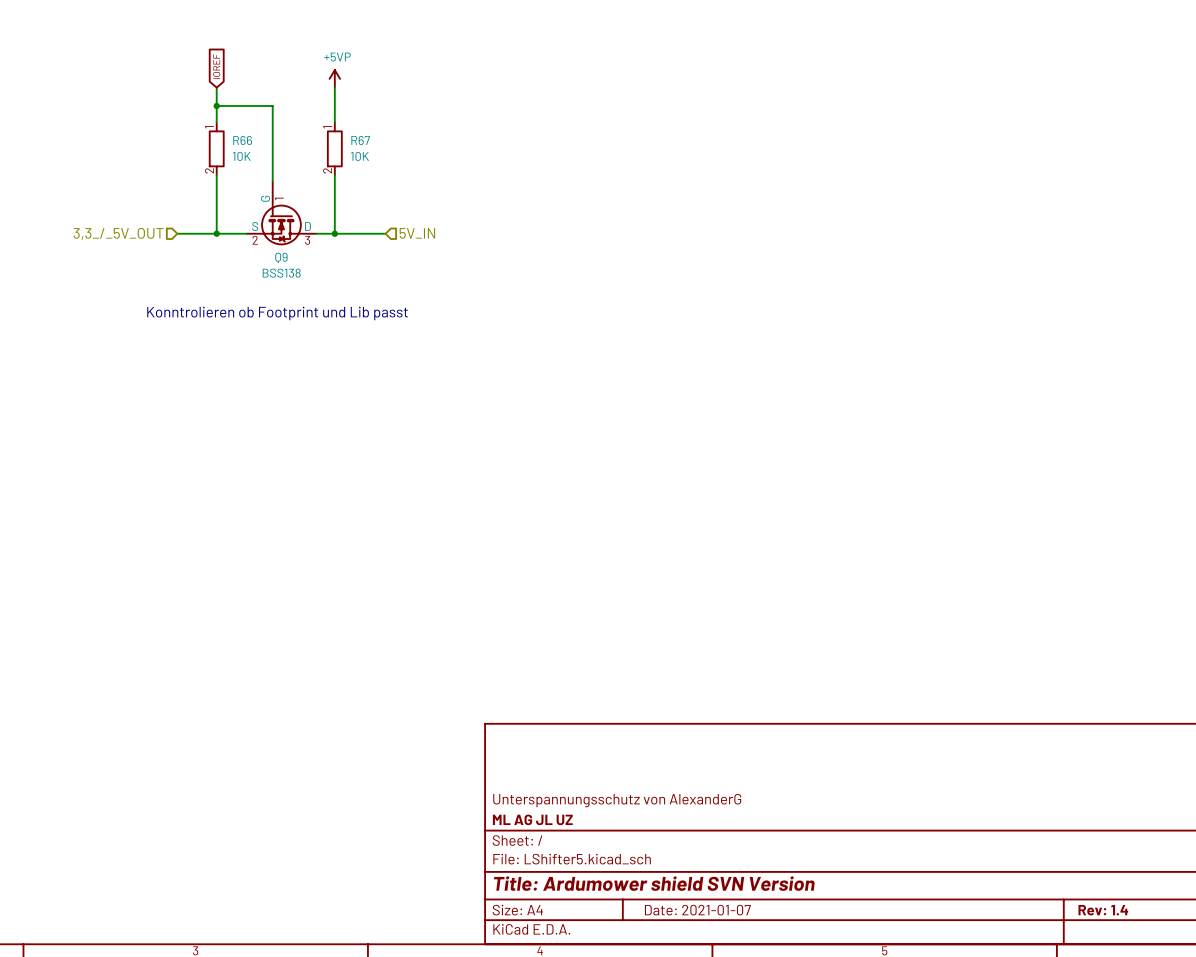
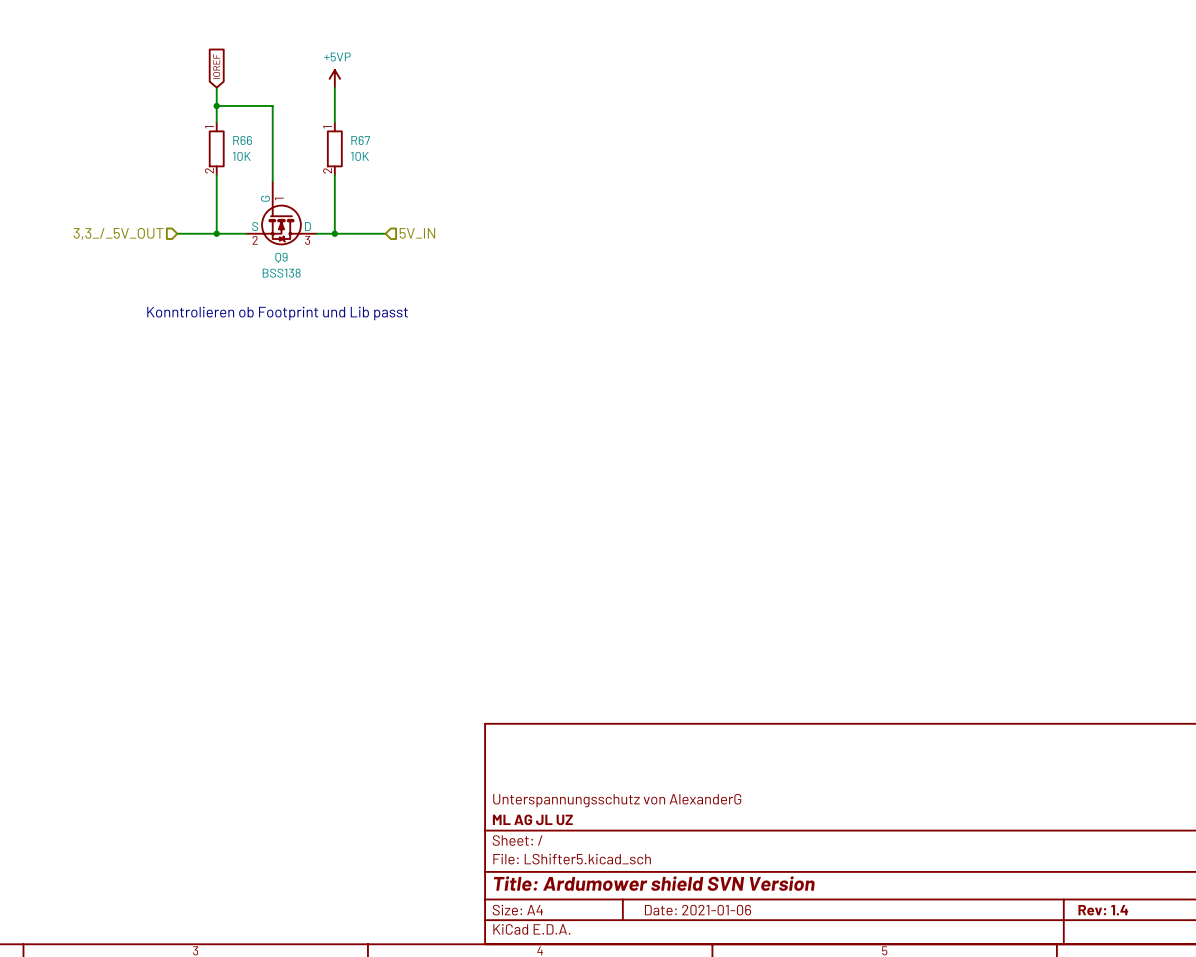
title block: Date: 2021-01-07 (697, 910) -> Date: 2021-01-06 (698, 910)

